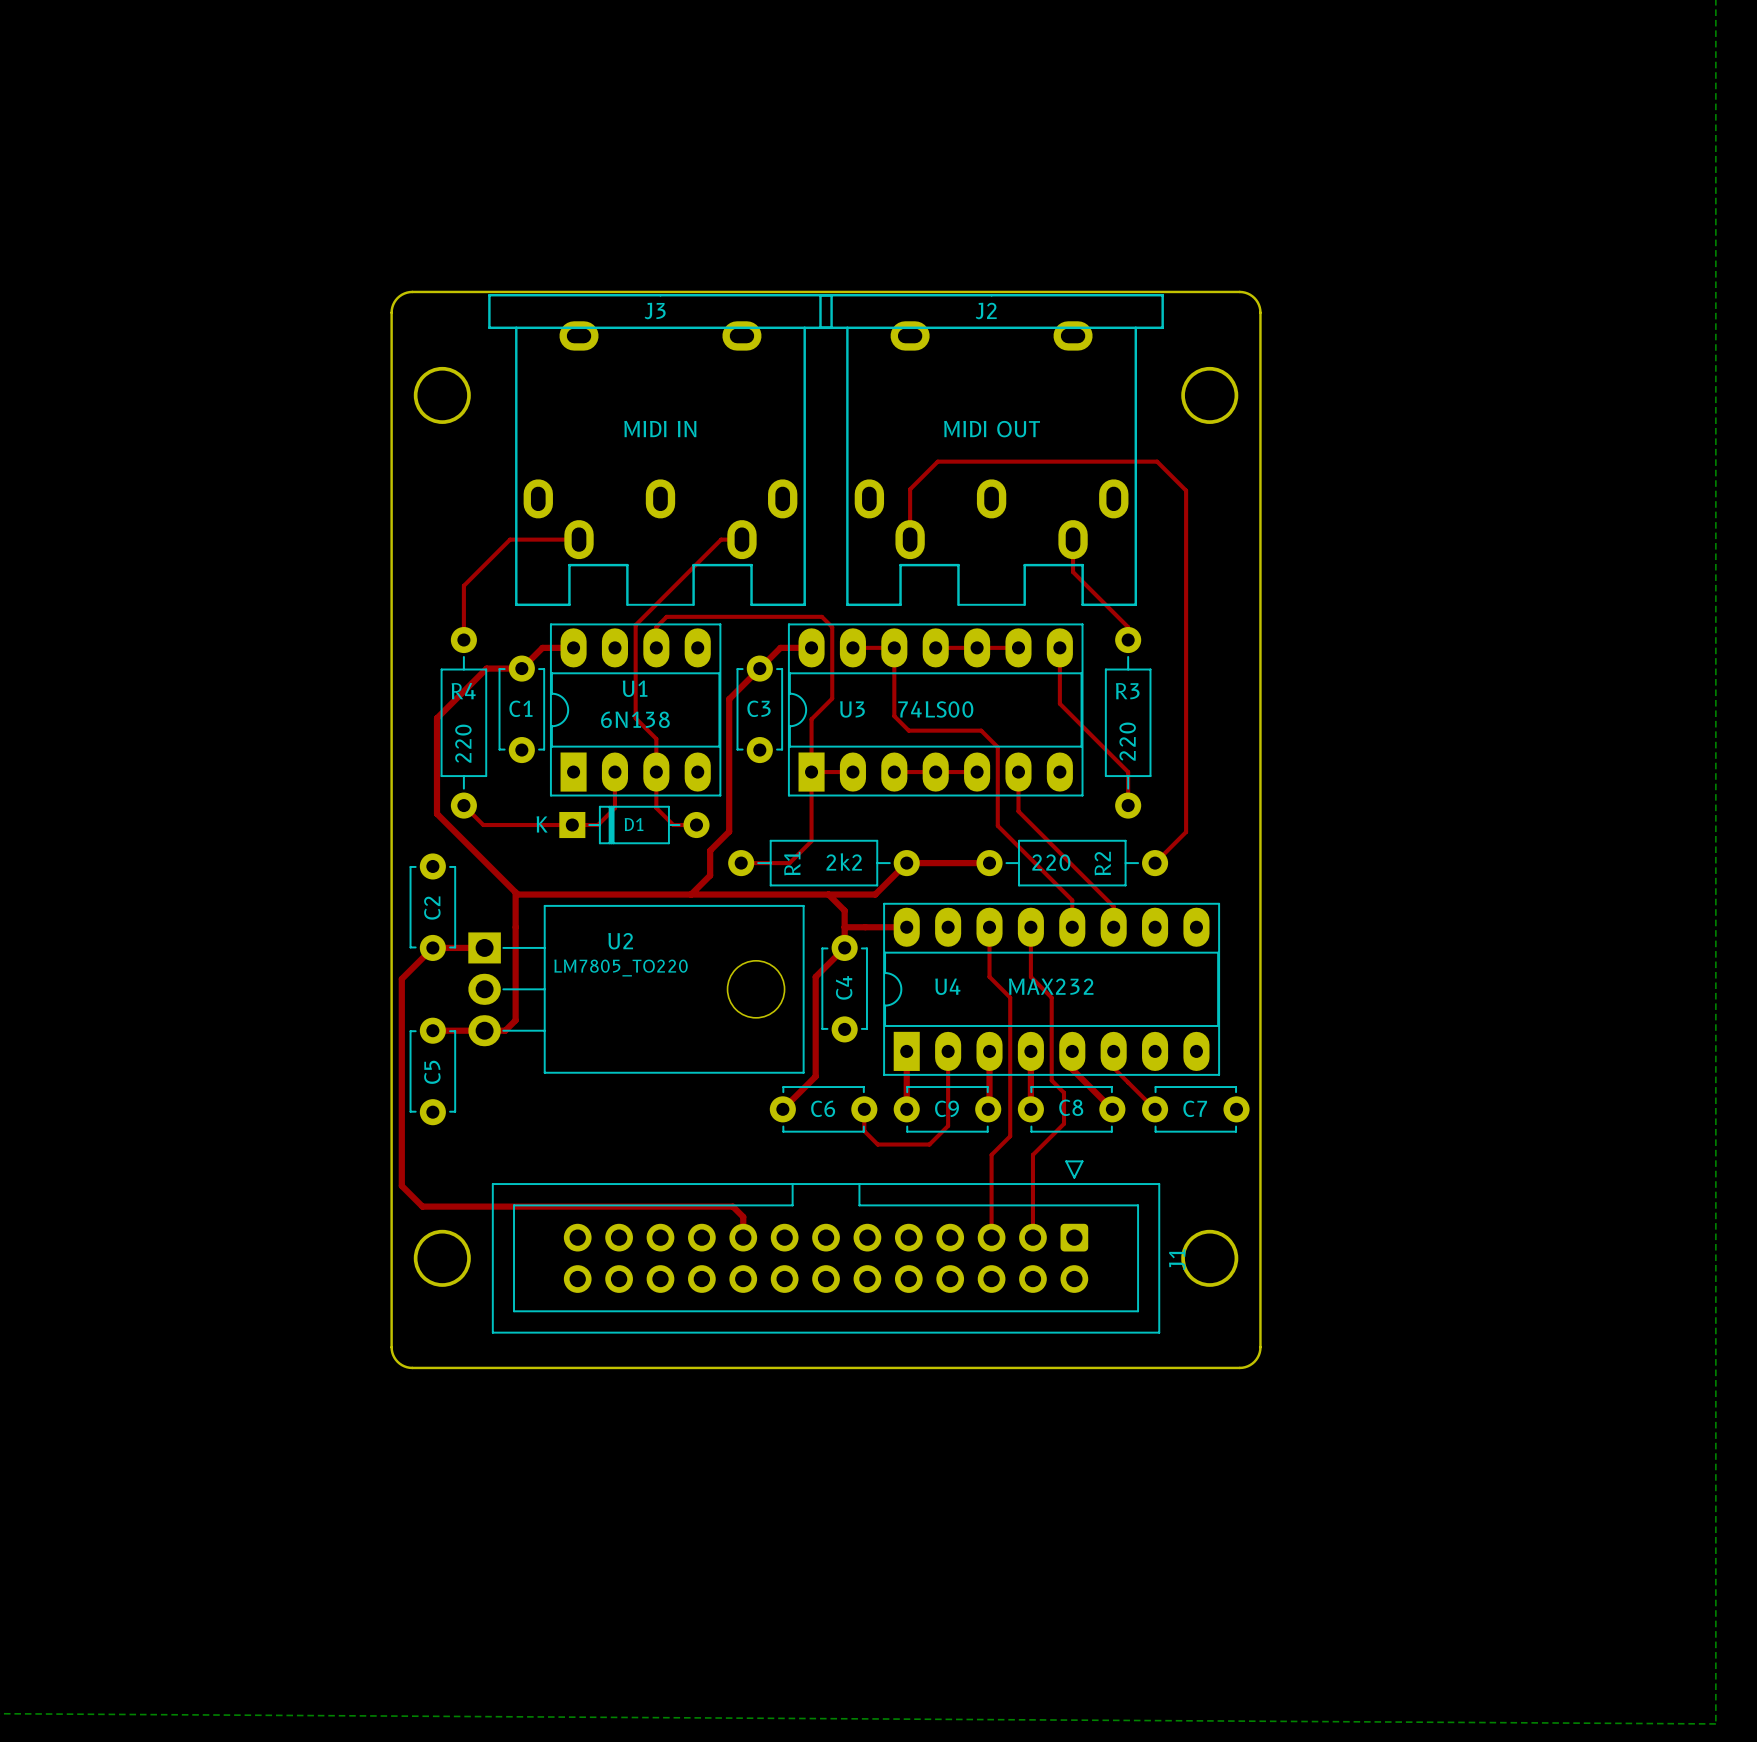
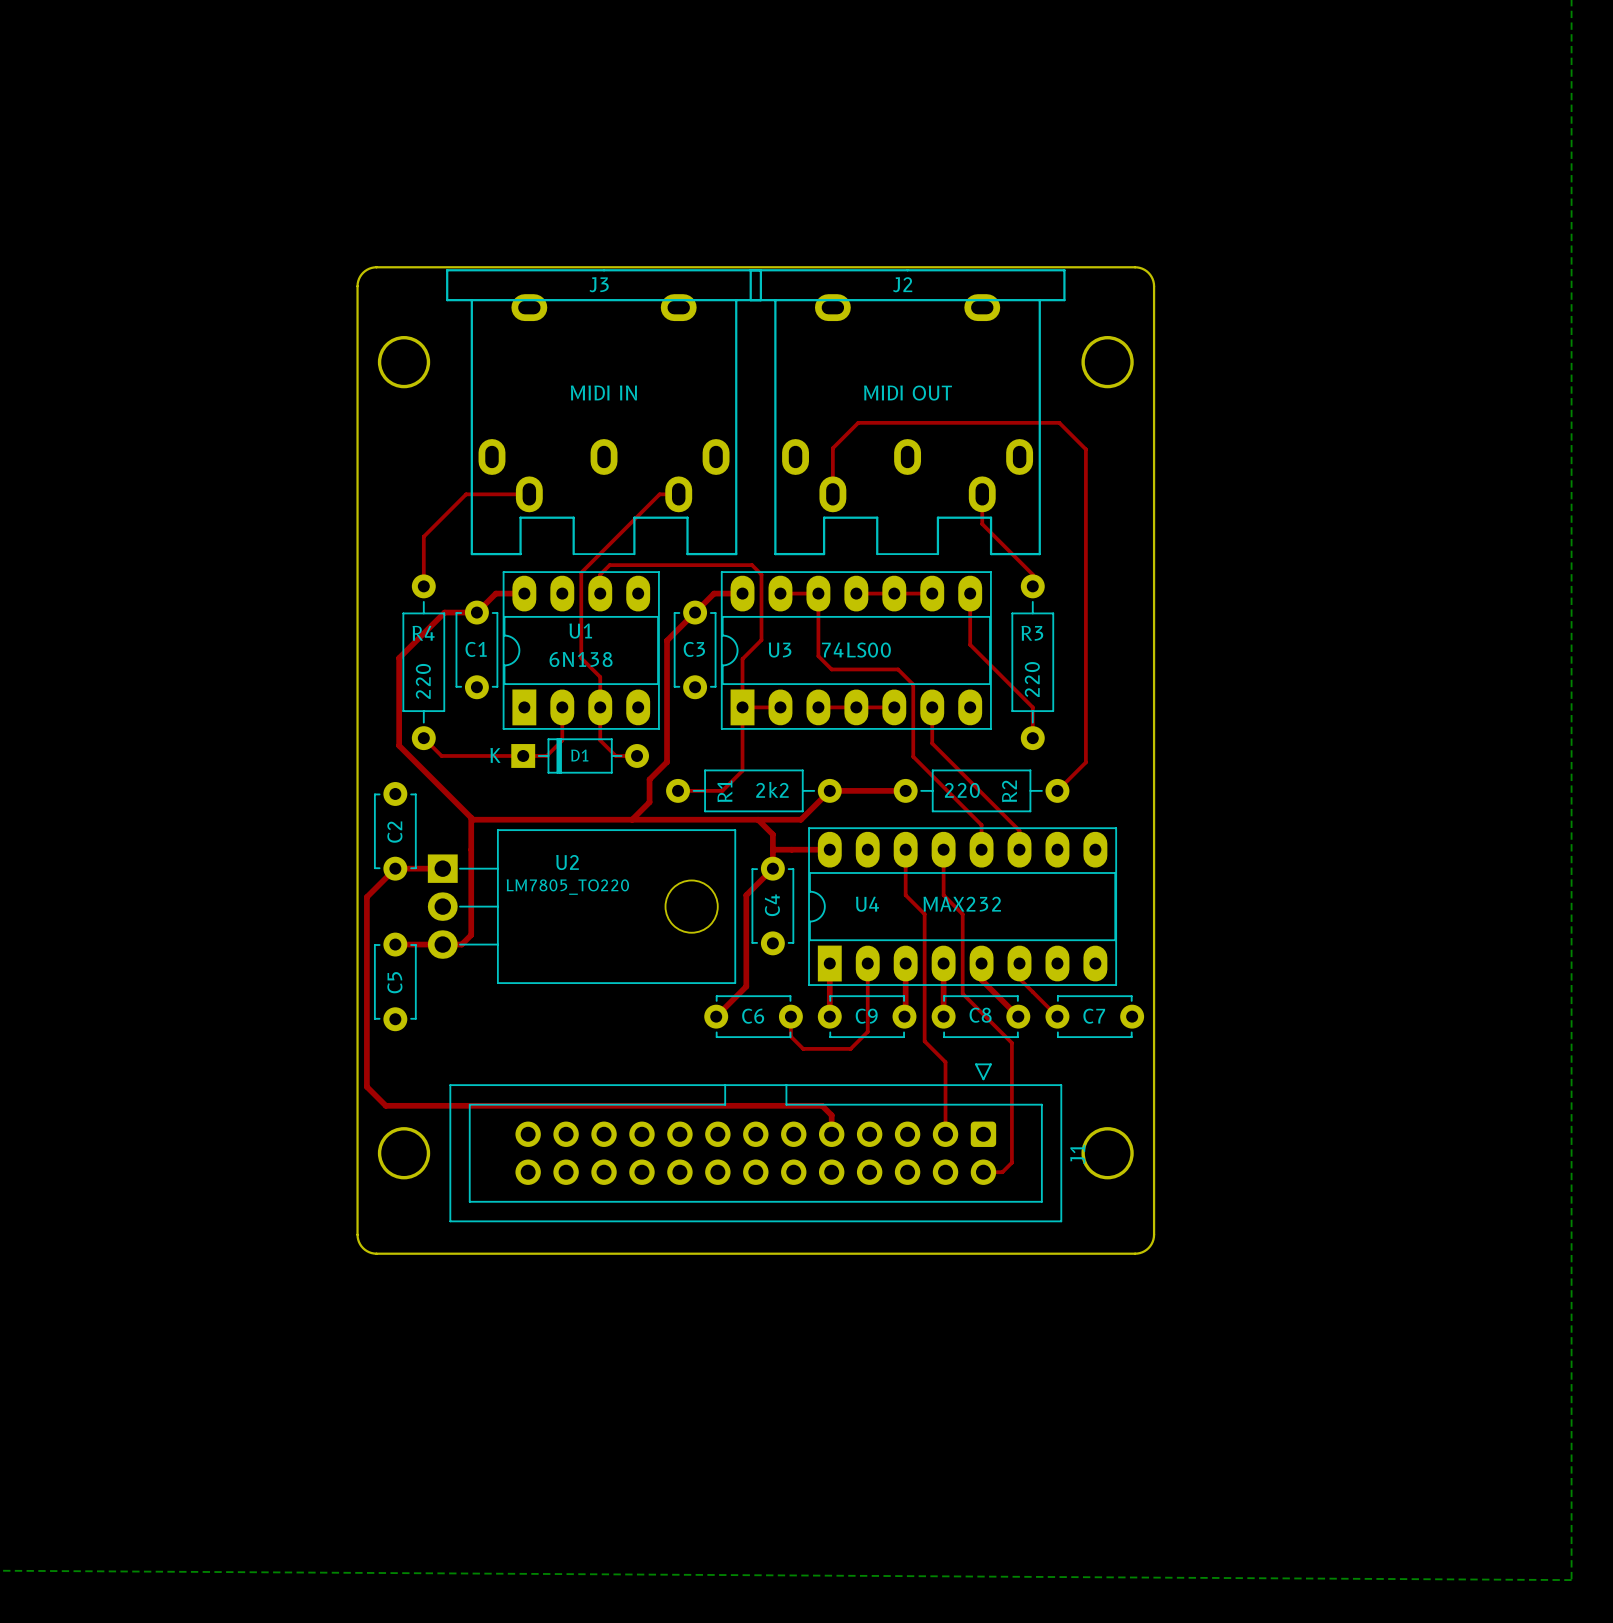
top track: (1051, 1080) (1064, 1092) (1064, 1123) (1032, 1154) (1032, 1159) -> (924, 1041) (945, 1062)
top track: none -> (962, 990) (962, 993) (1011, 1042) (1011, 1162) (1002, 1172) (983, 1172)
top track: (1010, 1136) (991, 1154) (991, 1237) -> none
top track: (732, 1206) (743, 1216) (743, 1237) -> (670, 1105) (822, 1105) (831, 1115) (831, 1134)

